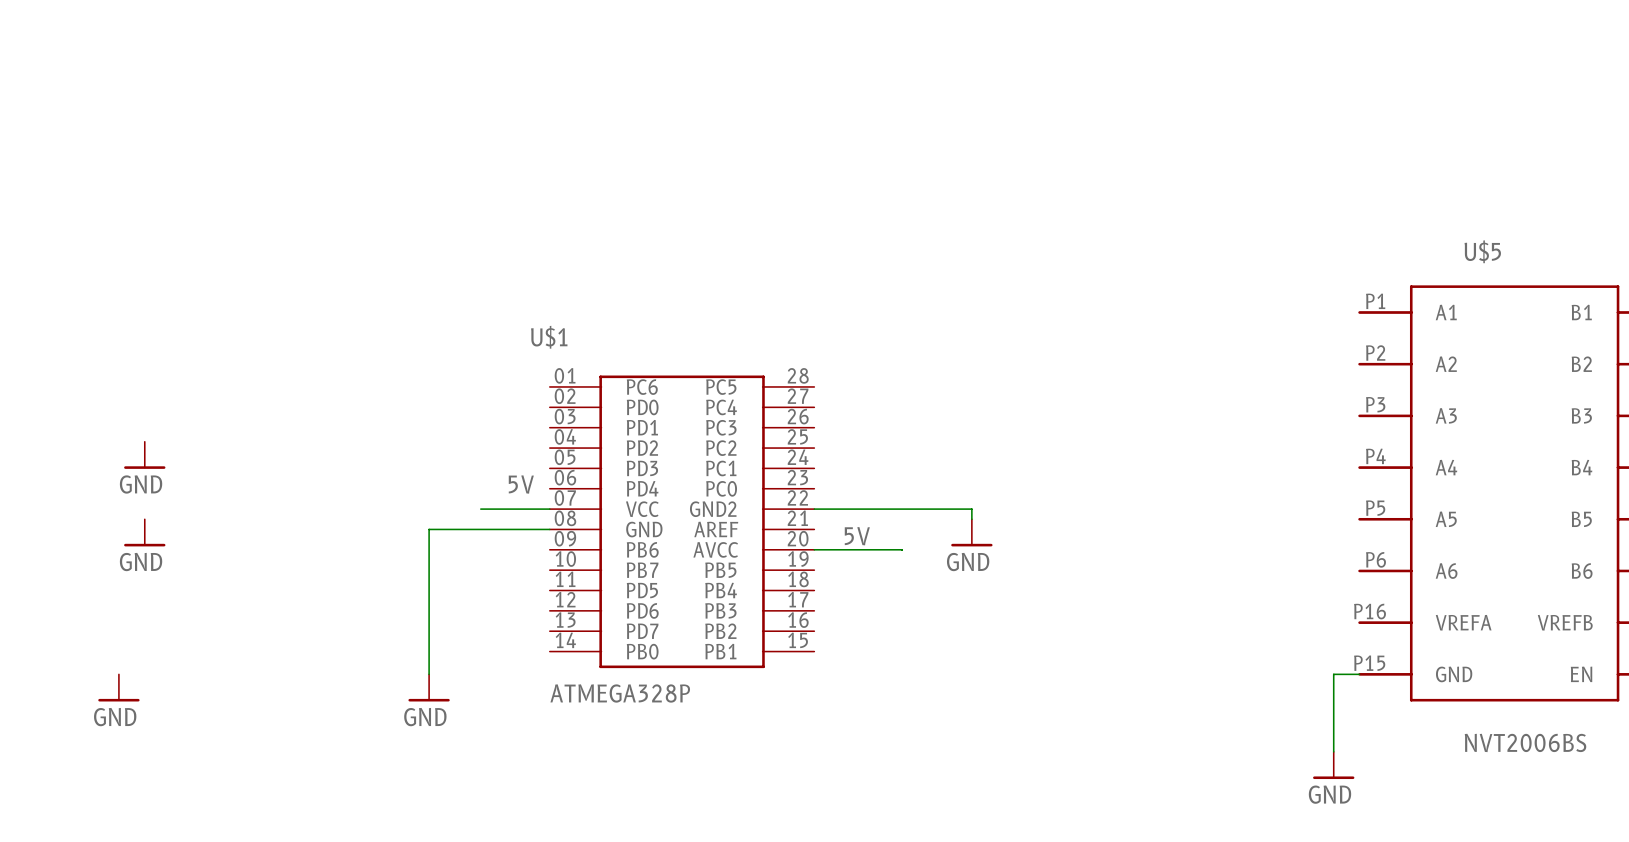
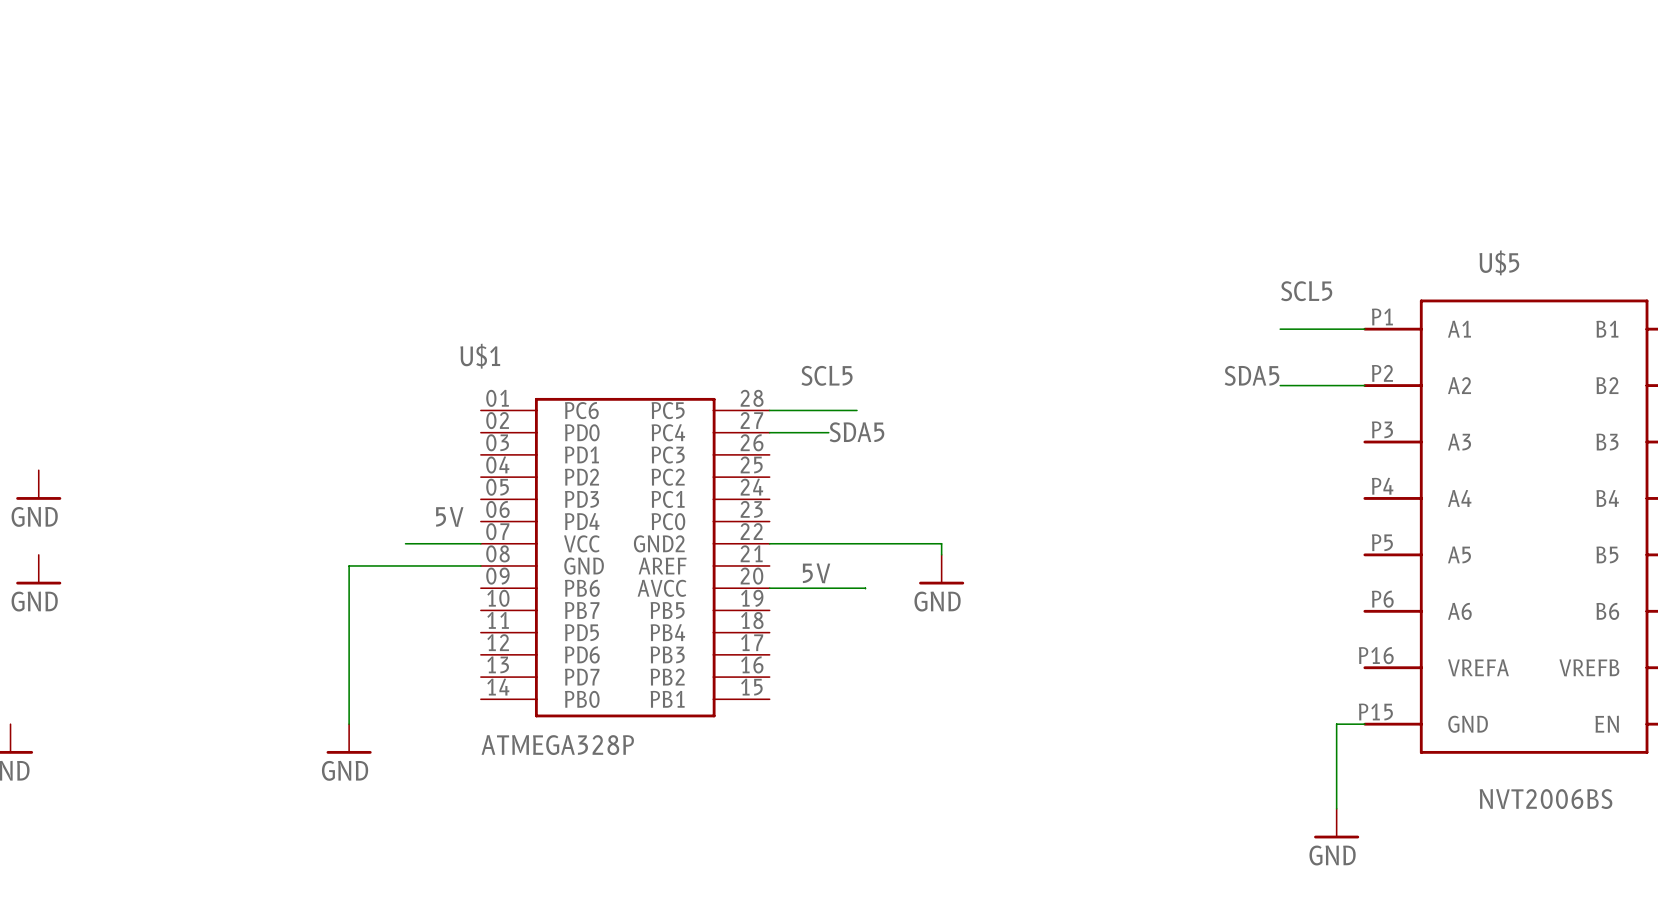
label: none -> SCL5 (1306, 291)
wire: none -> (1280, 329) (1364, 329)
label: none -> SCL5 (827, 375)
label: none -> SDA5 (1252, 375)
wire: none -> (1280, 385) (1364, 385)
wire: none -> (769, 410) (856, 410)
label: none -> SDA5 (857, 432)
wire: none -> (769, 432) (828, 432)

